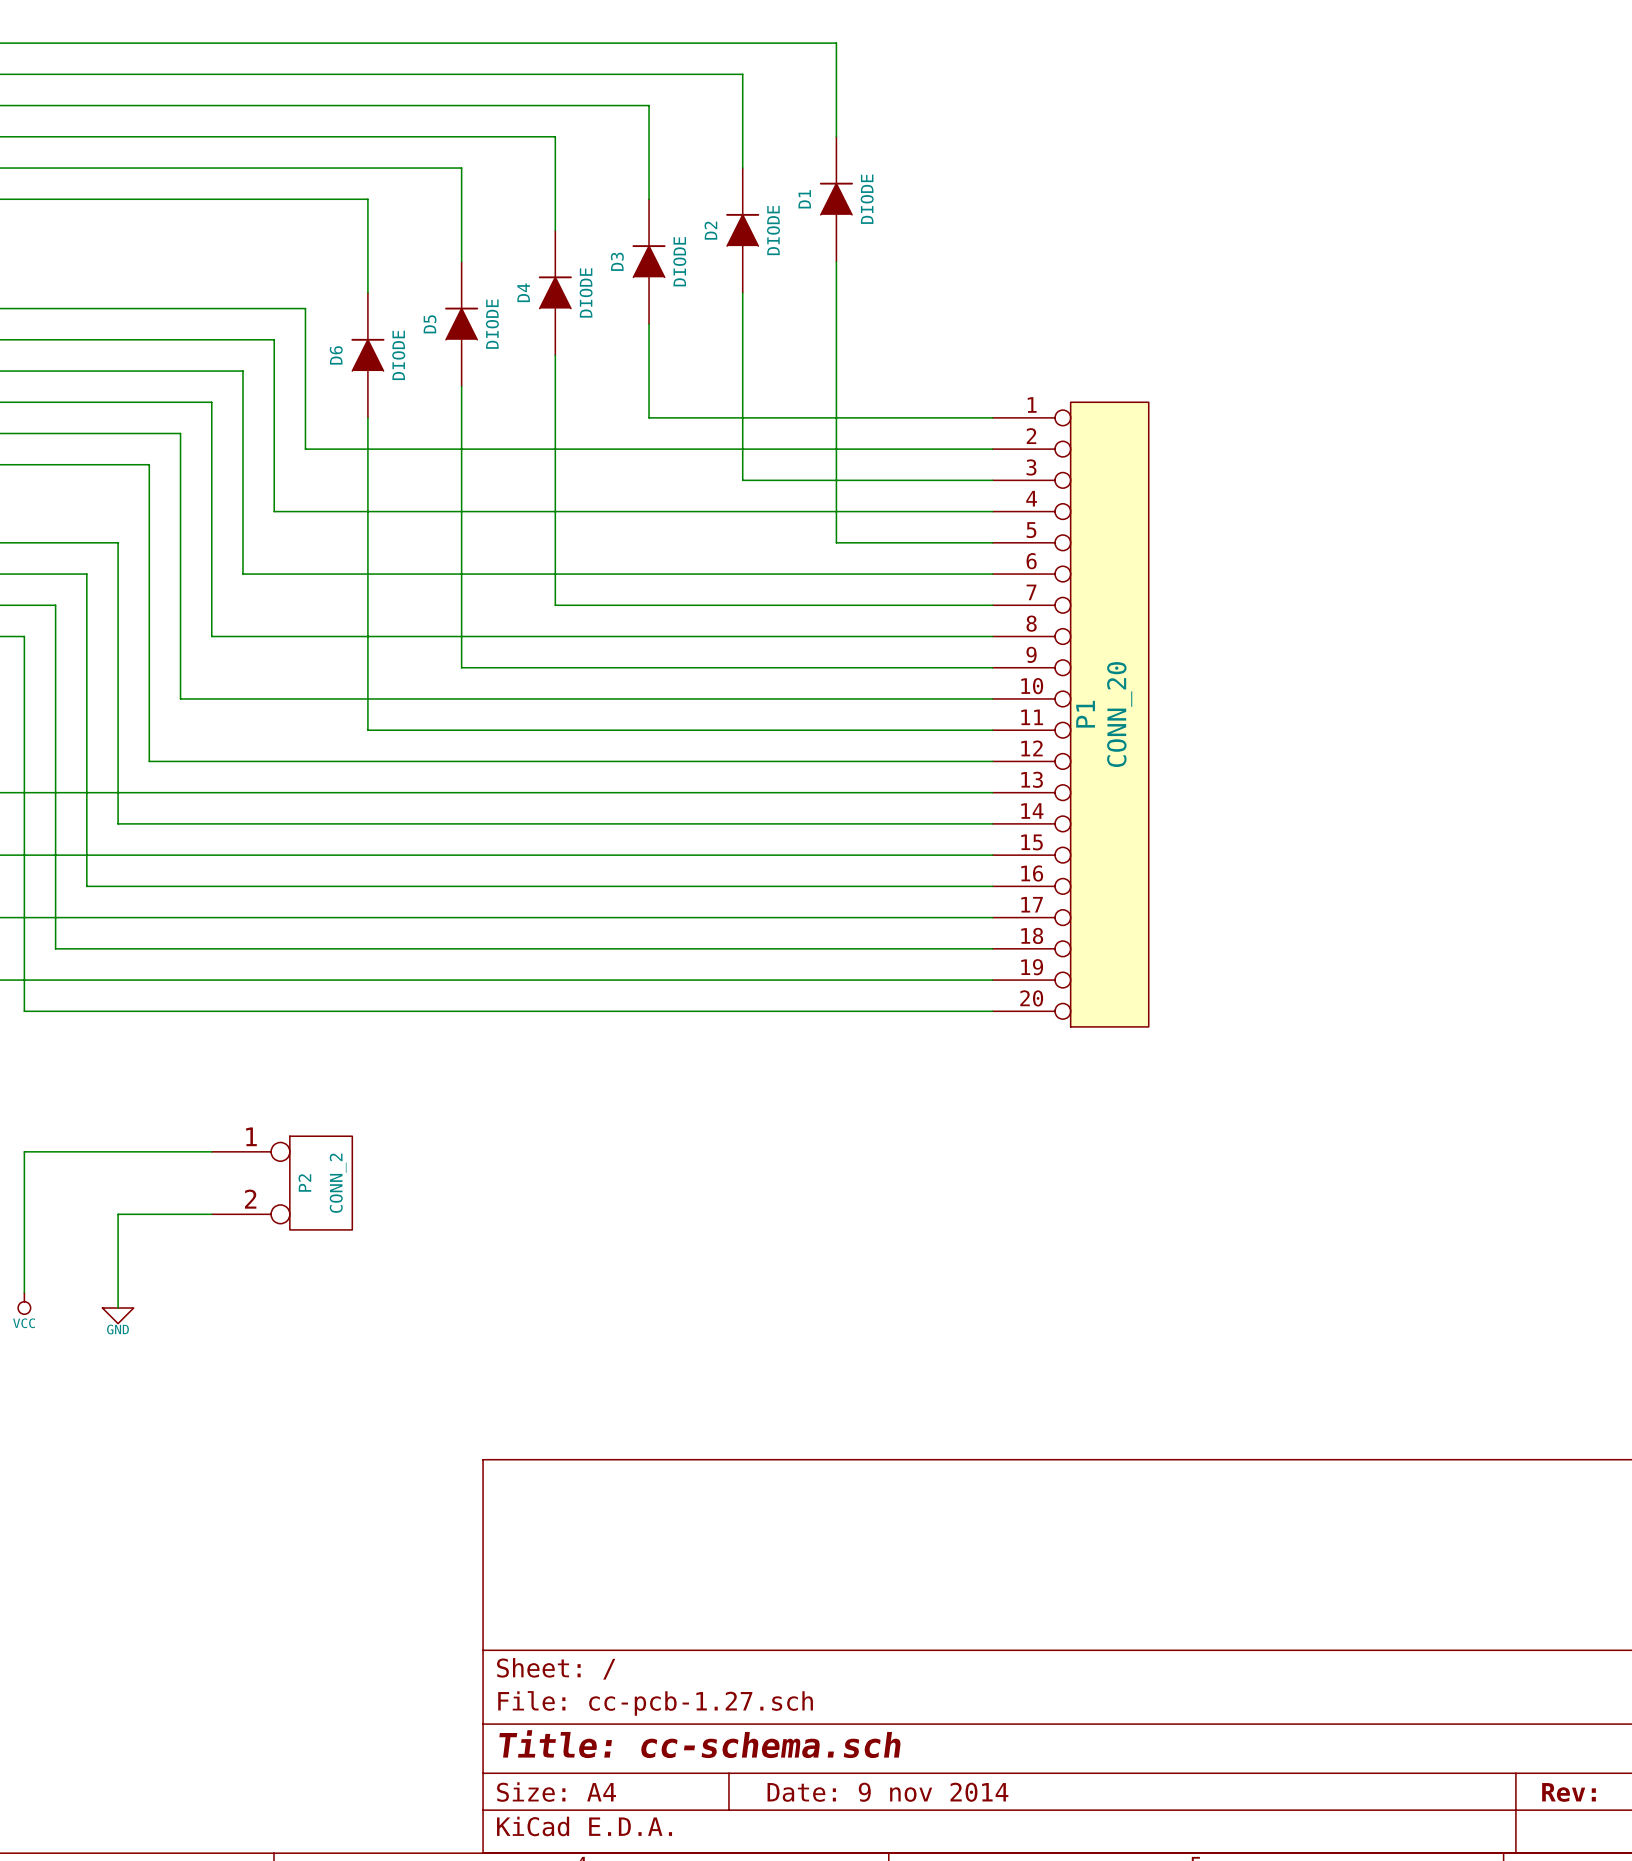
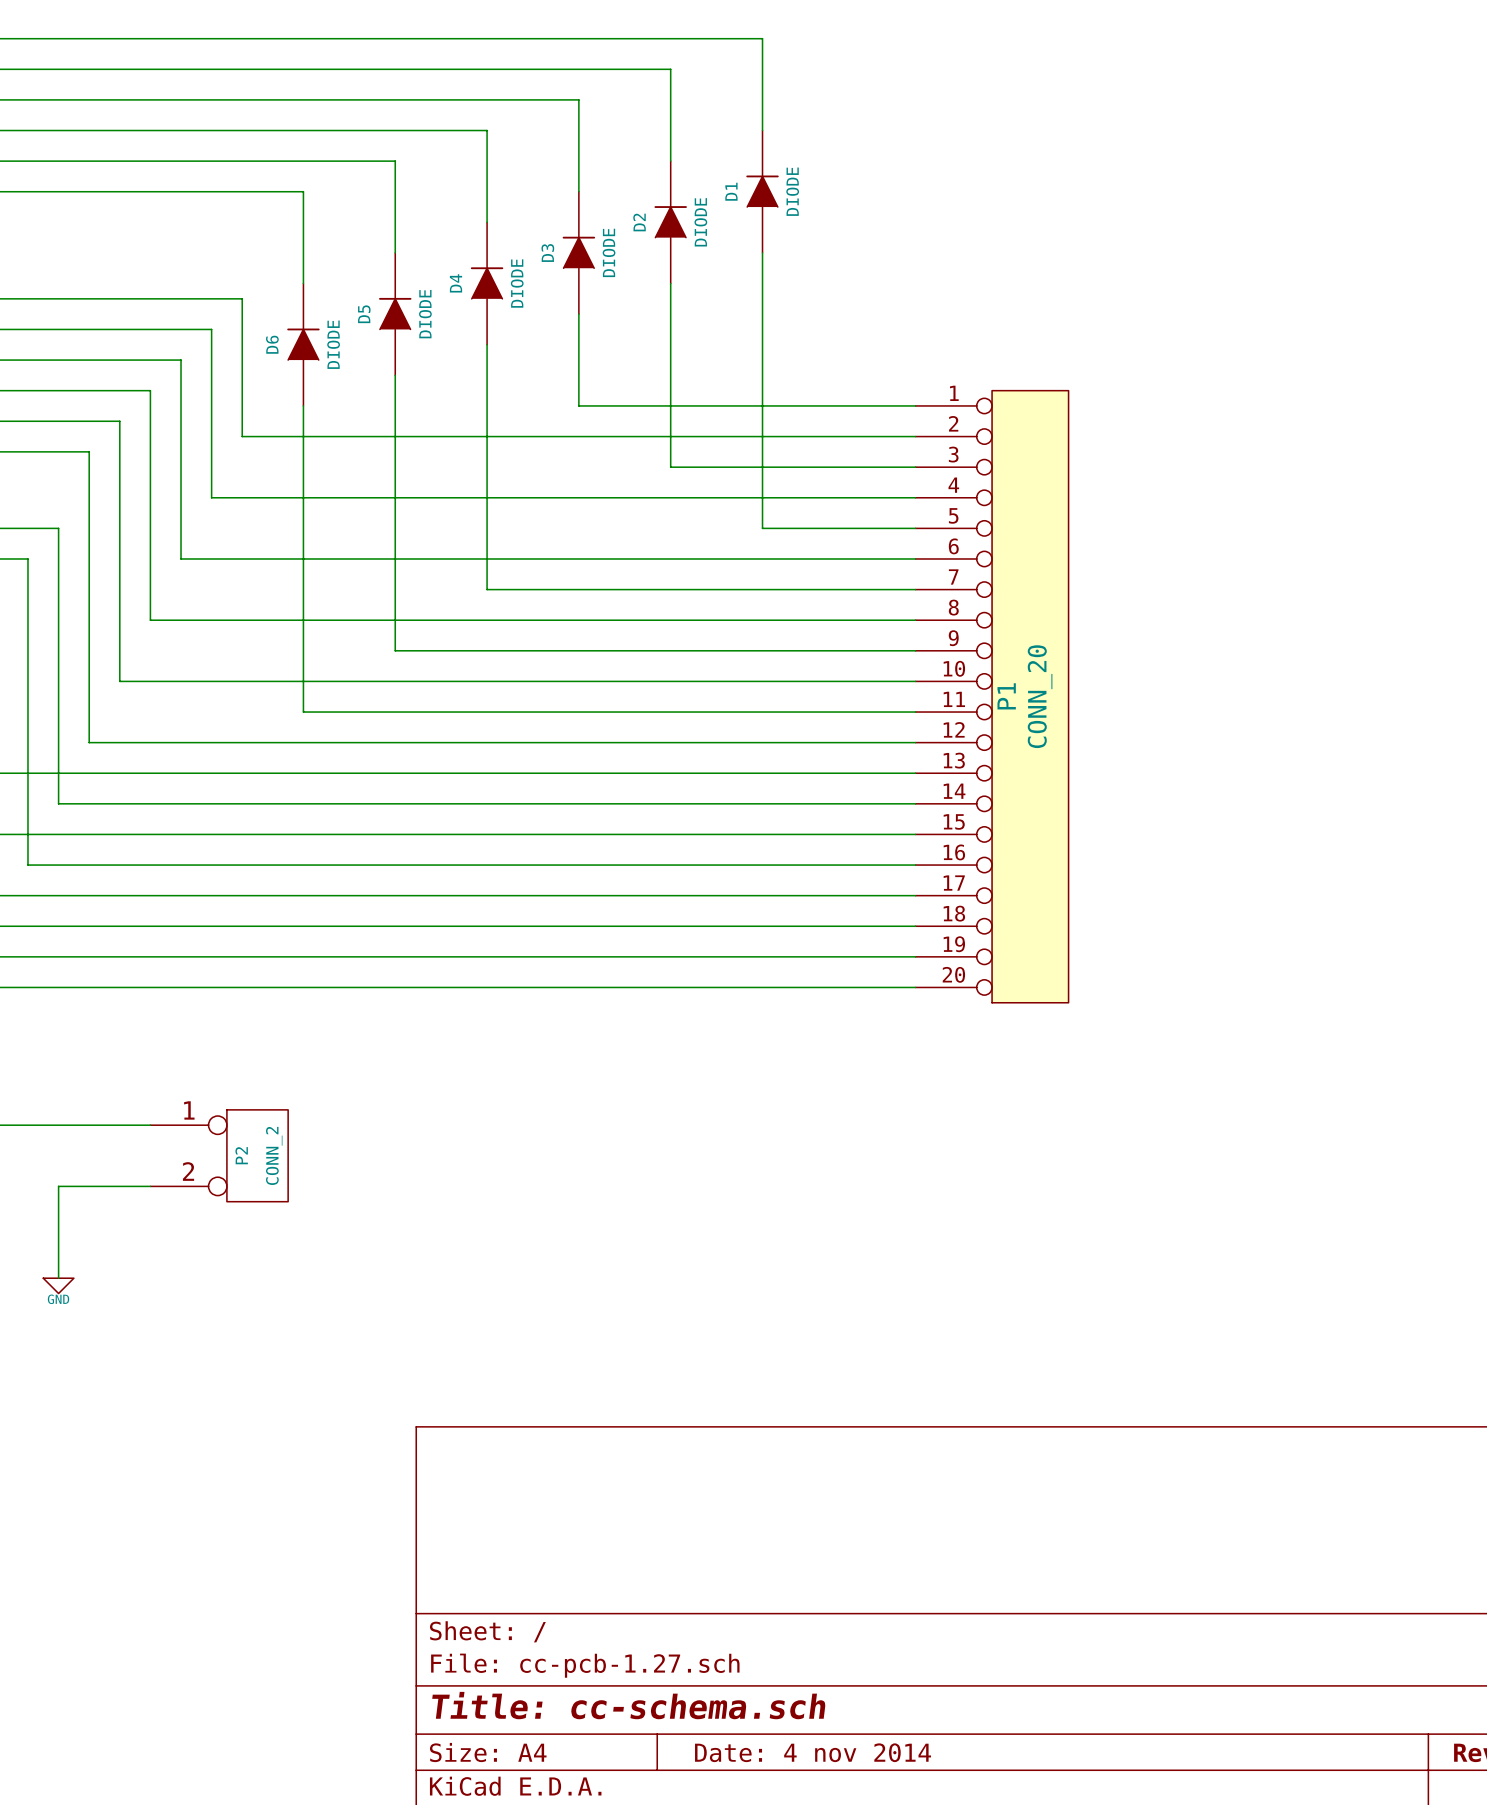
title block: Date: 9 nov 2014 (887, 1792) -> Date: 4 nov 2014 (813, 1752)

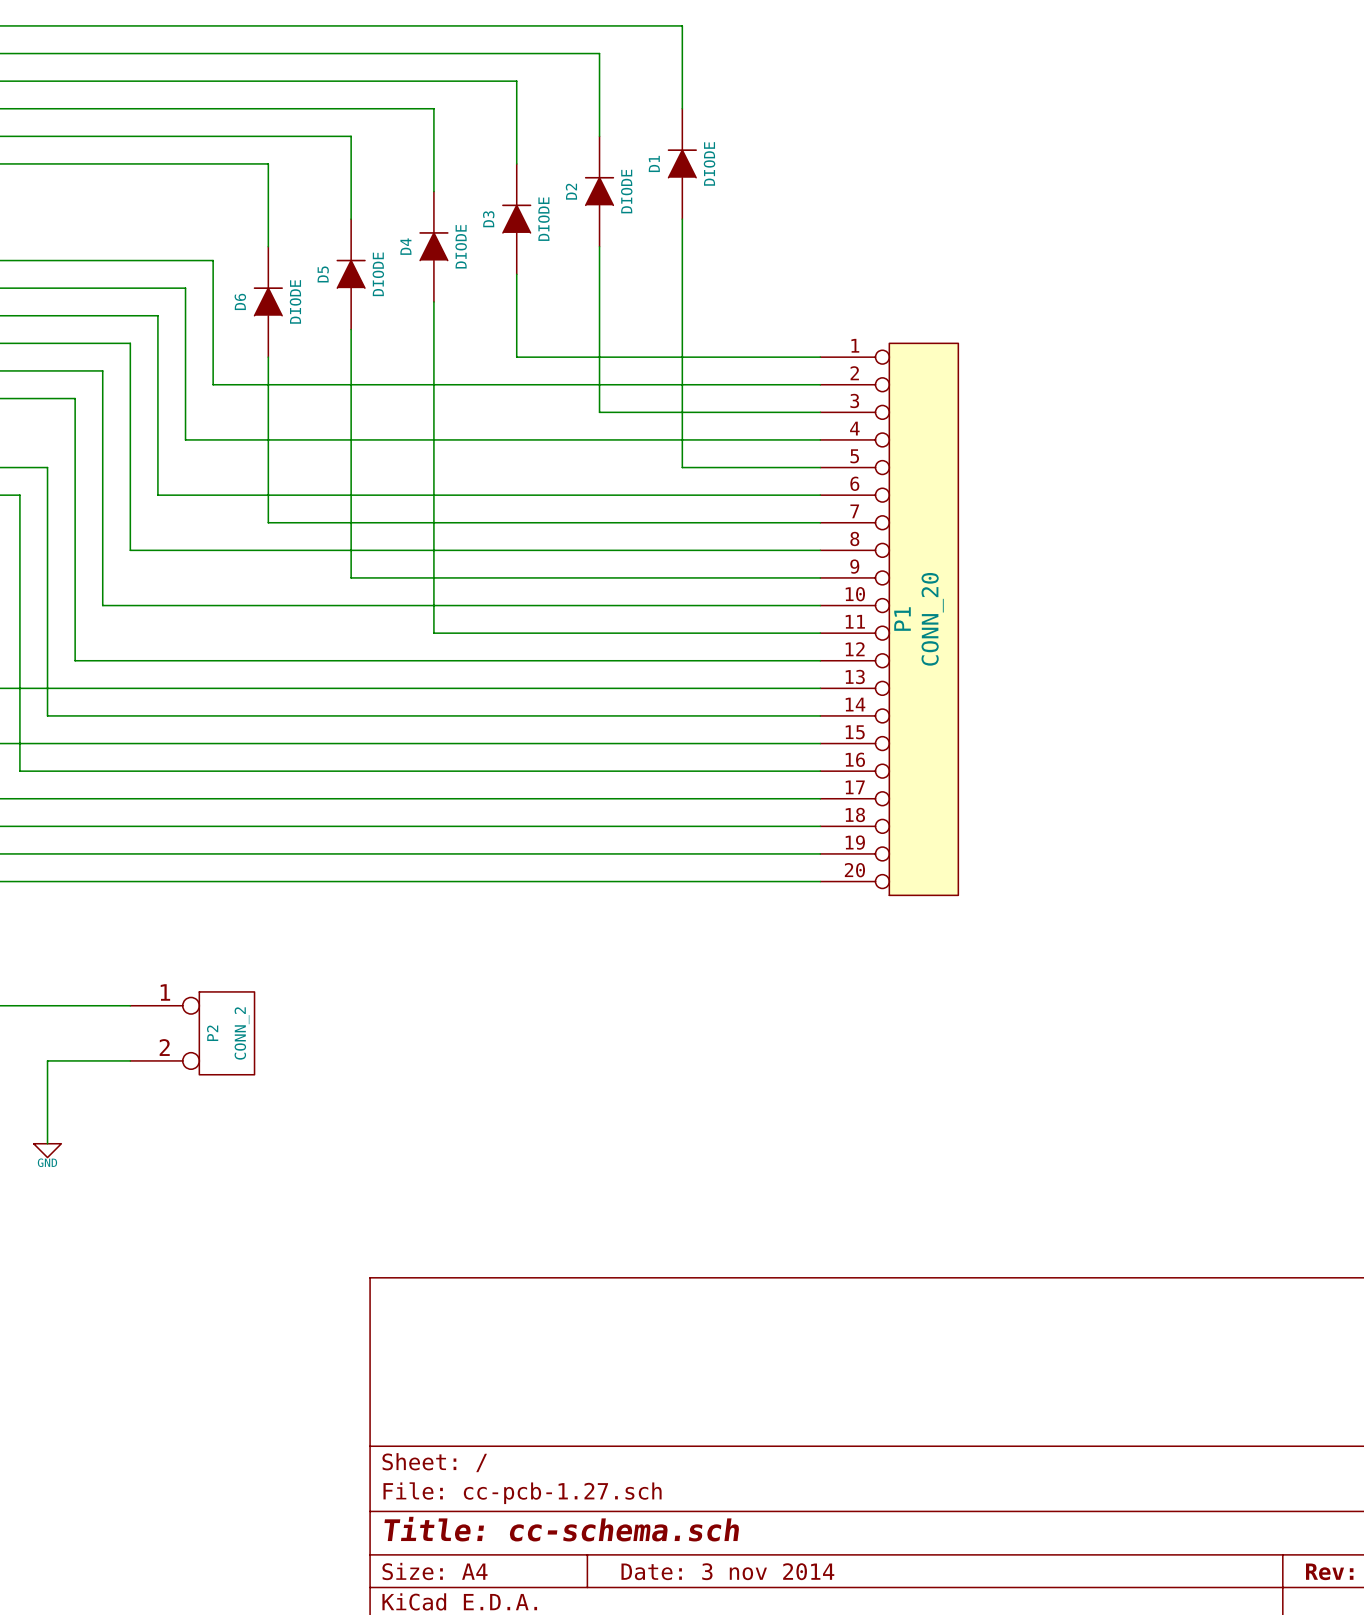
wire: (303, 589) (303, 712) (487, 712) -> (268, 522) (433, 522) (433, 633)
title block: Date: 4 nov 2014 (813, 1752) -> Date: 3 nov 2014 (727, 1571)

